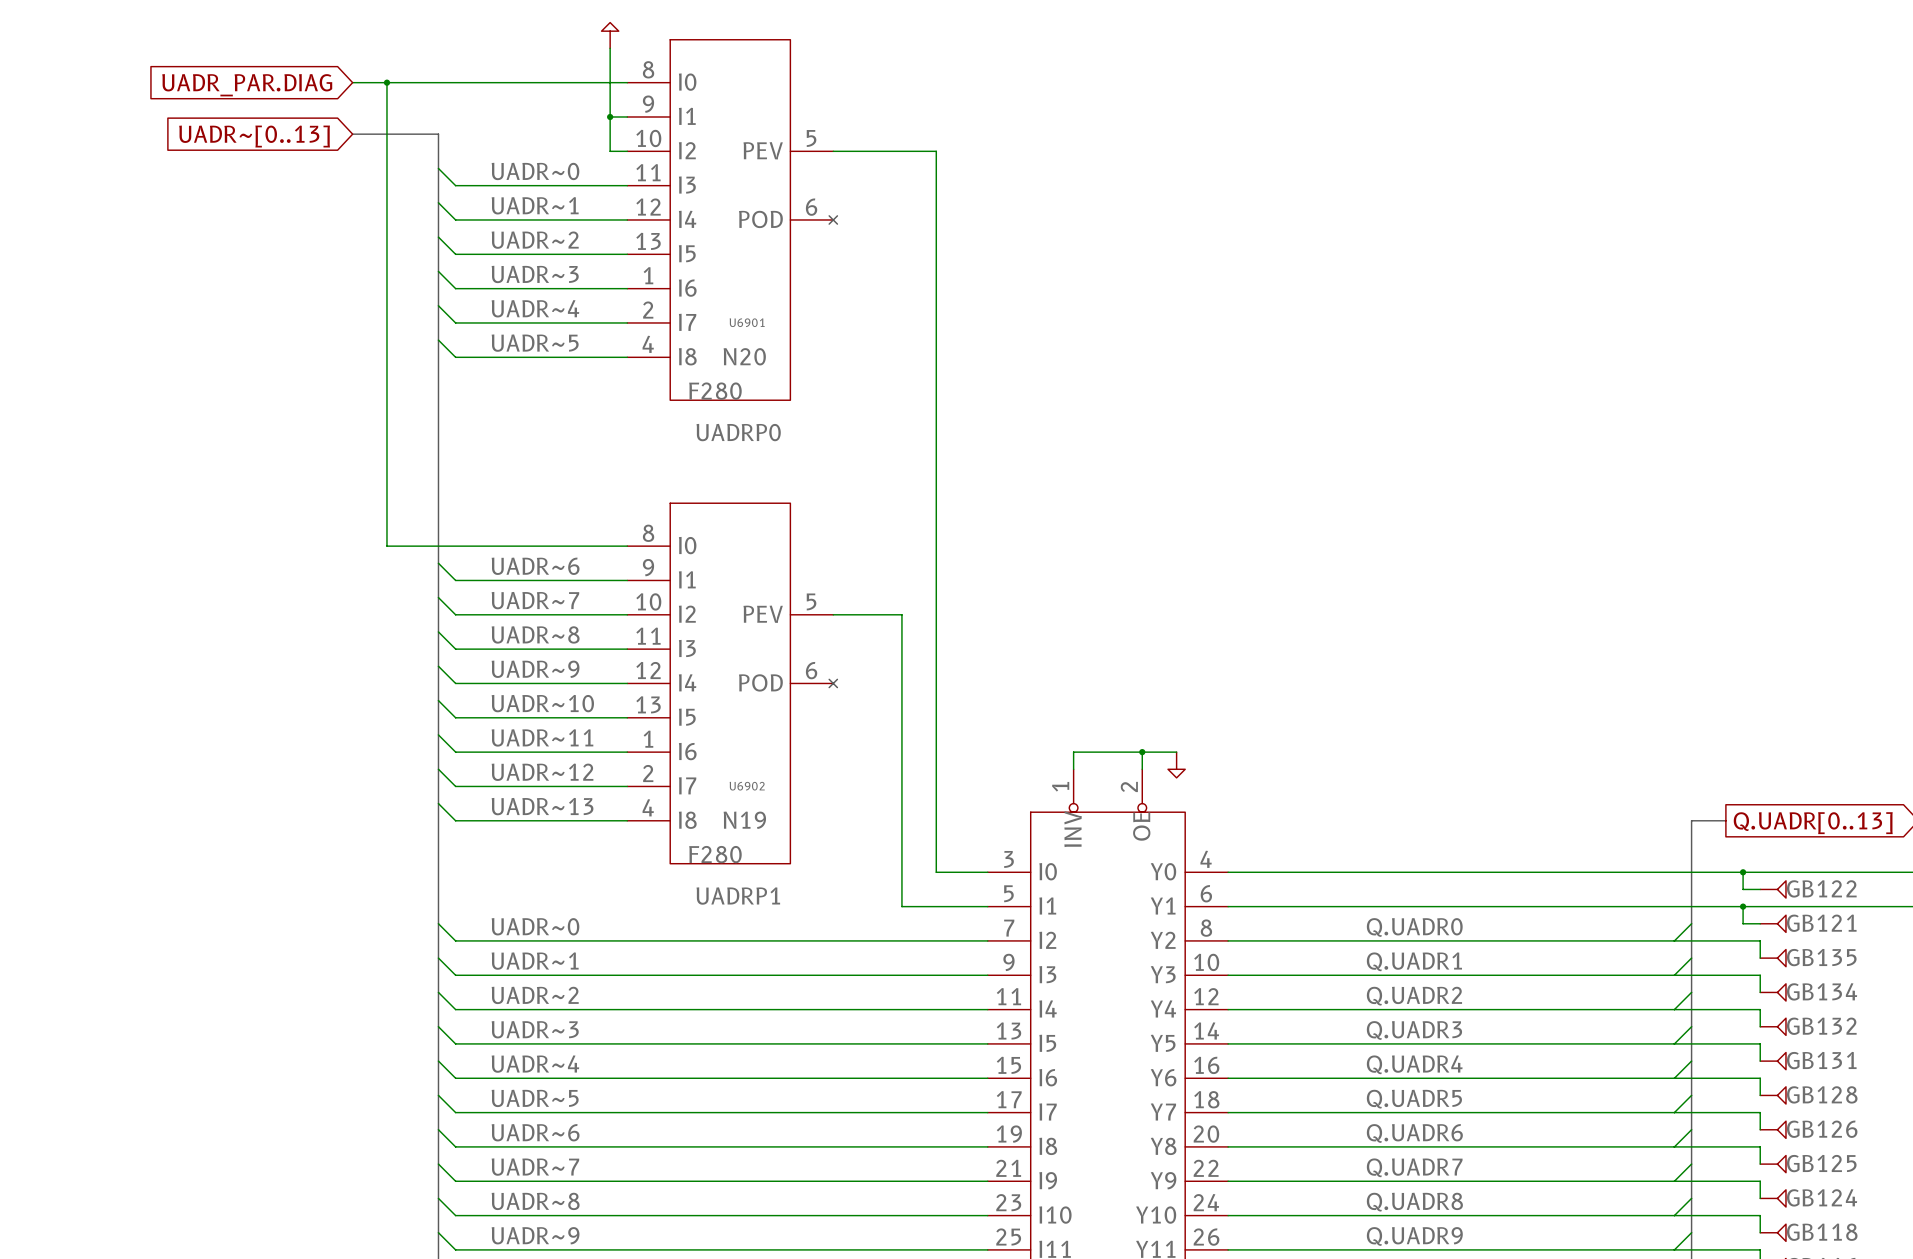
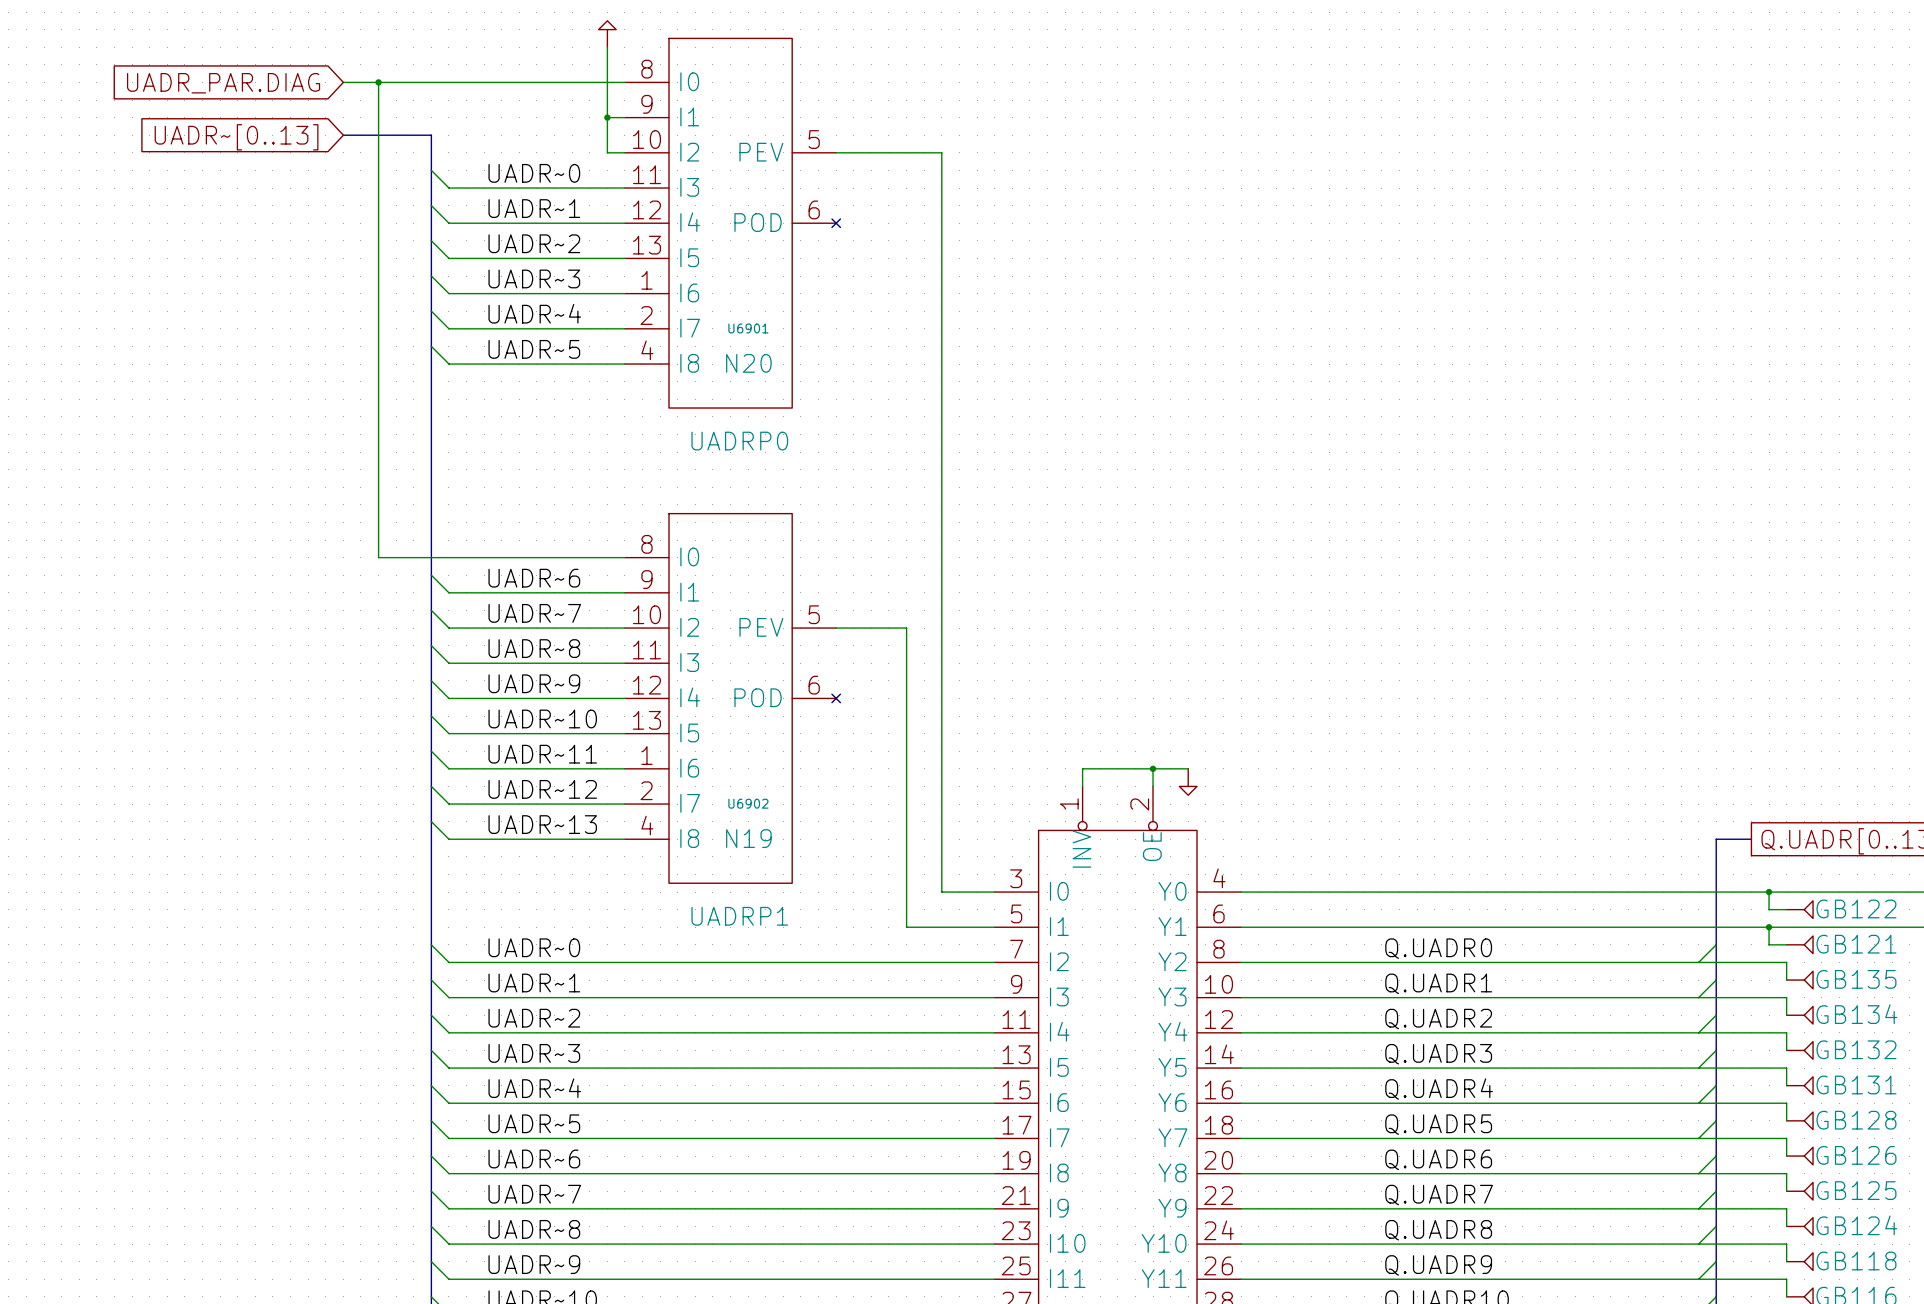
U6901 value: F280 (715, 391) -> none
U6902 value: F280 (715, 854) -> none

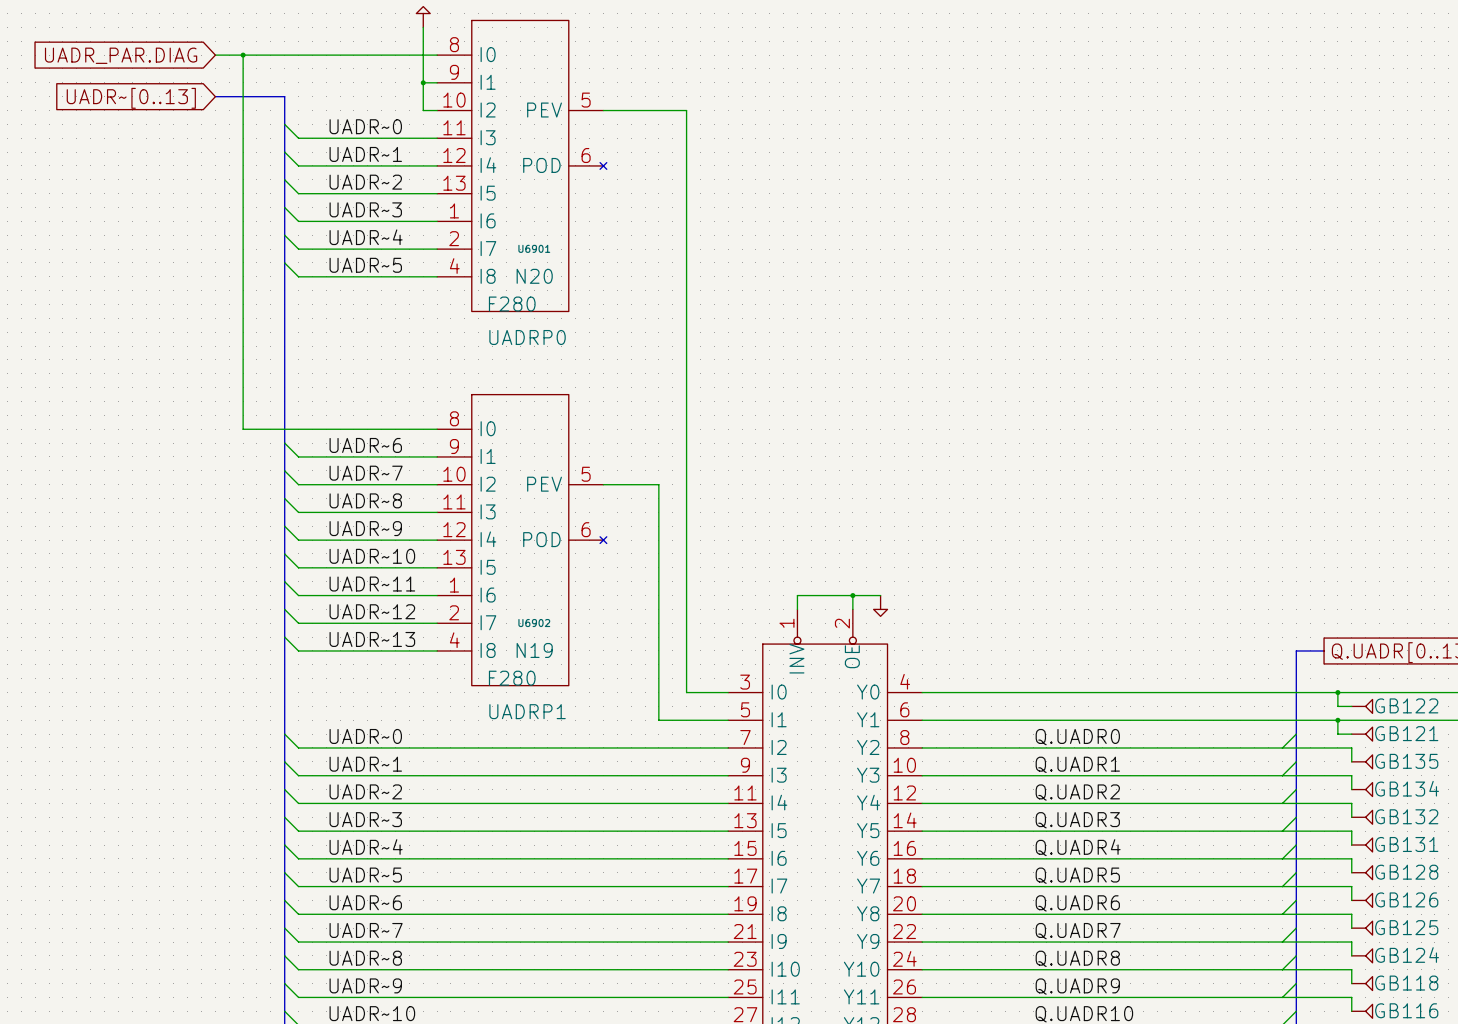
U6901 value: none -> F280 (512, 304)
U6902 value: none -> F280 (512, 678)

